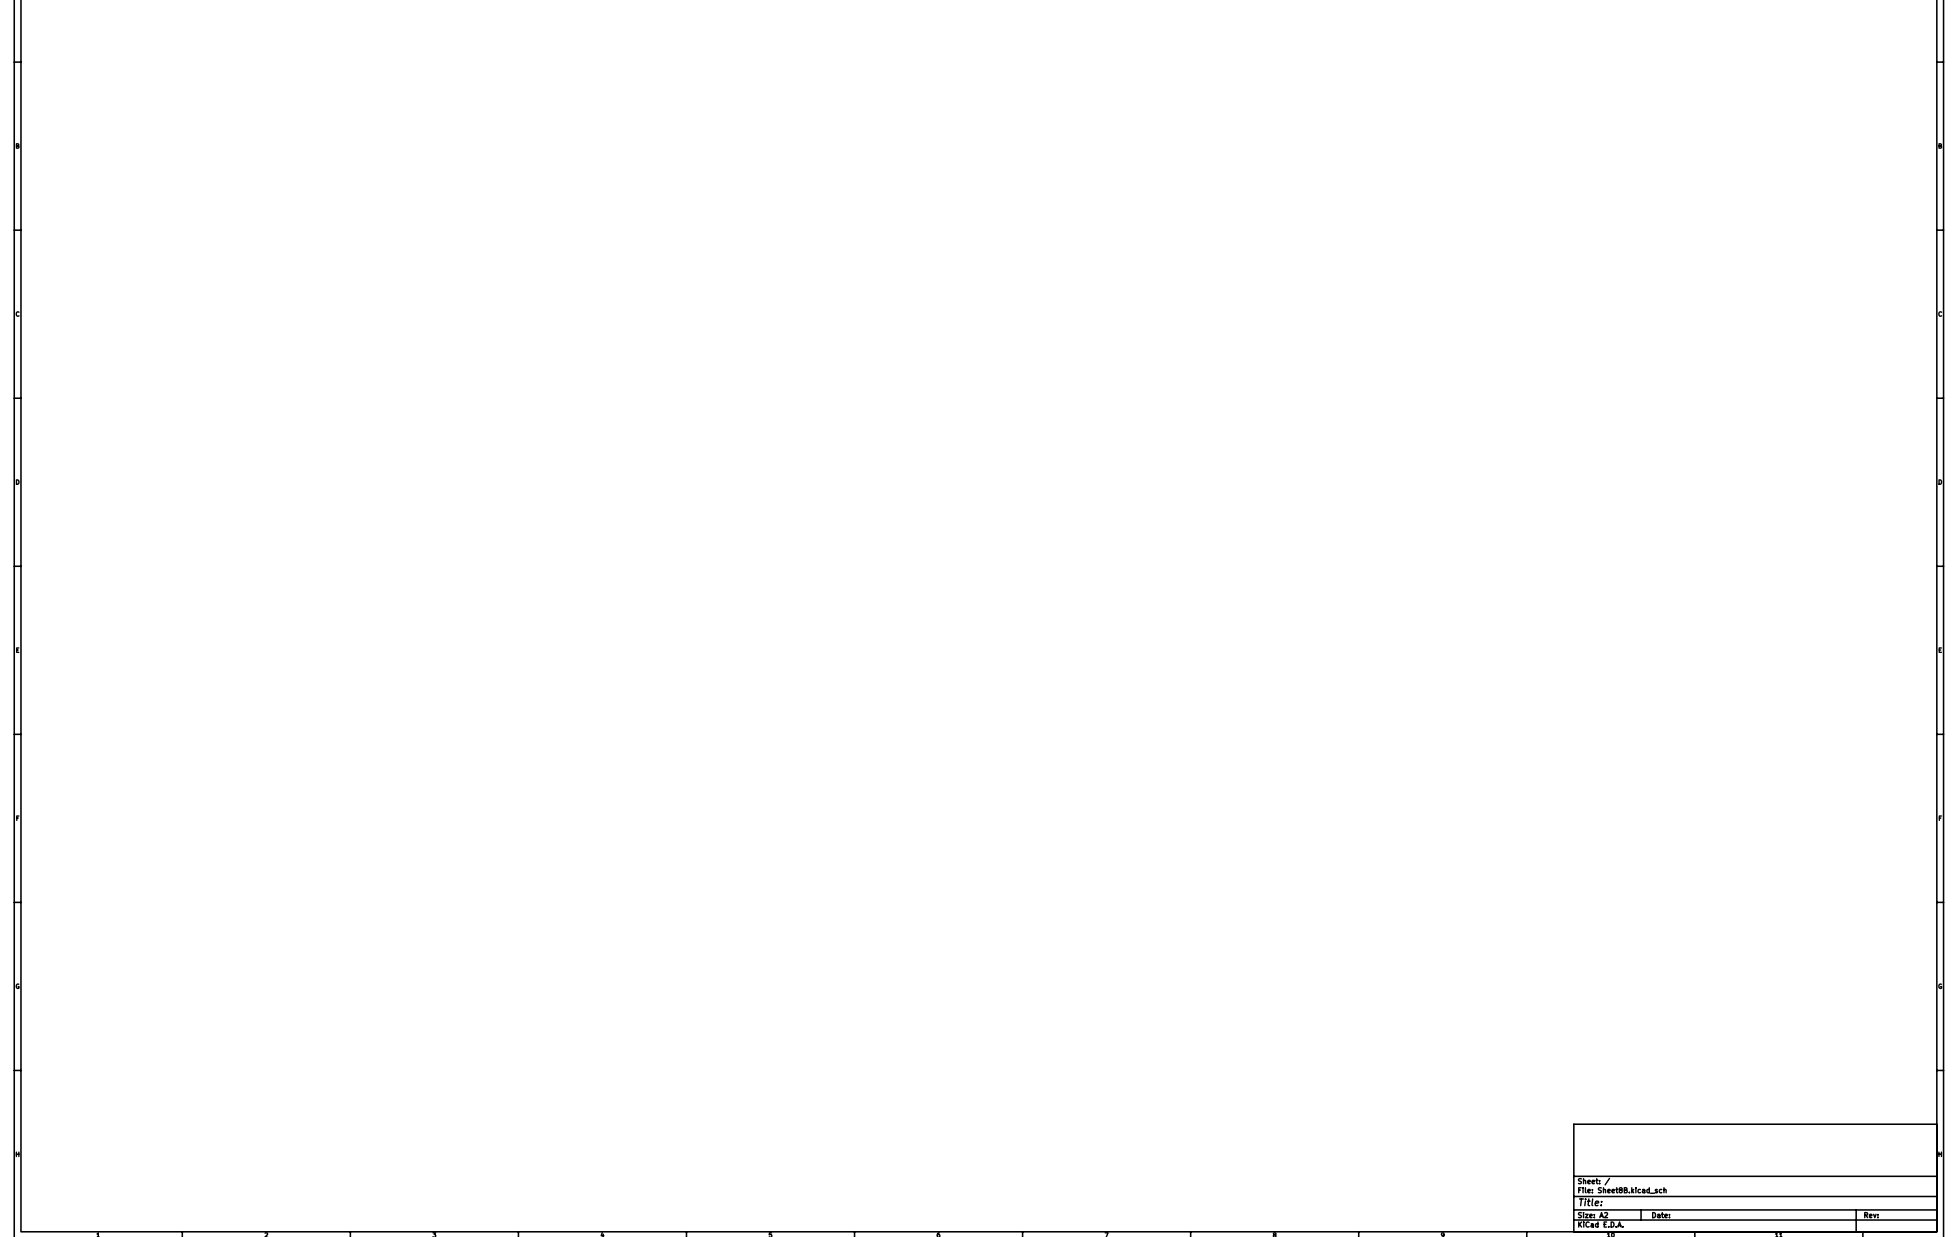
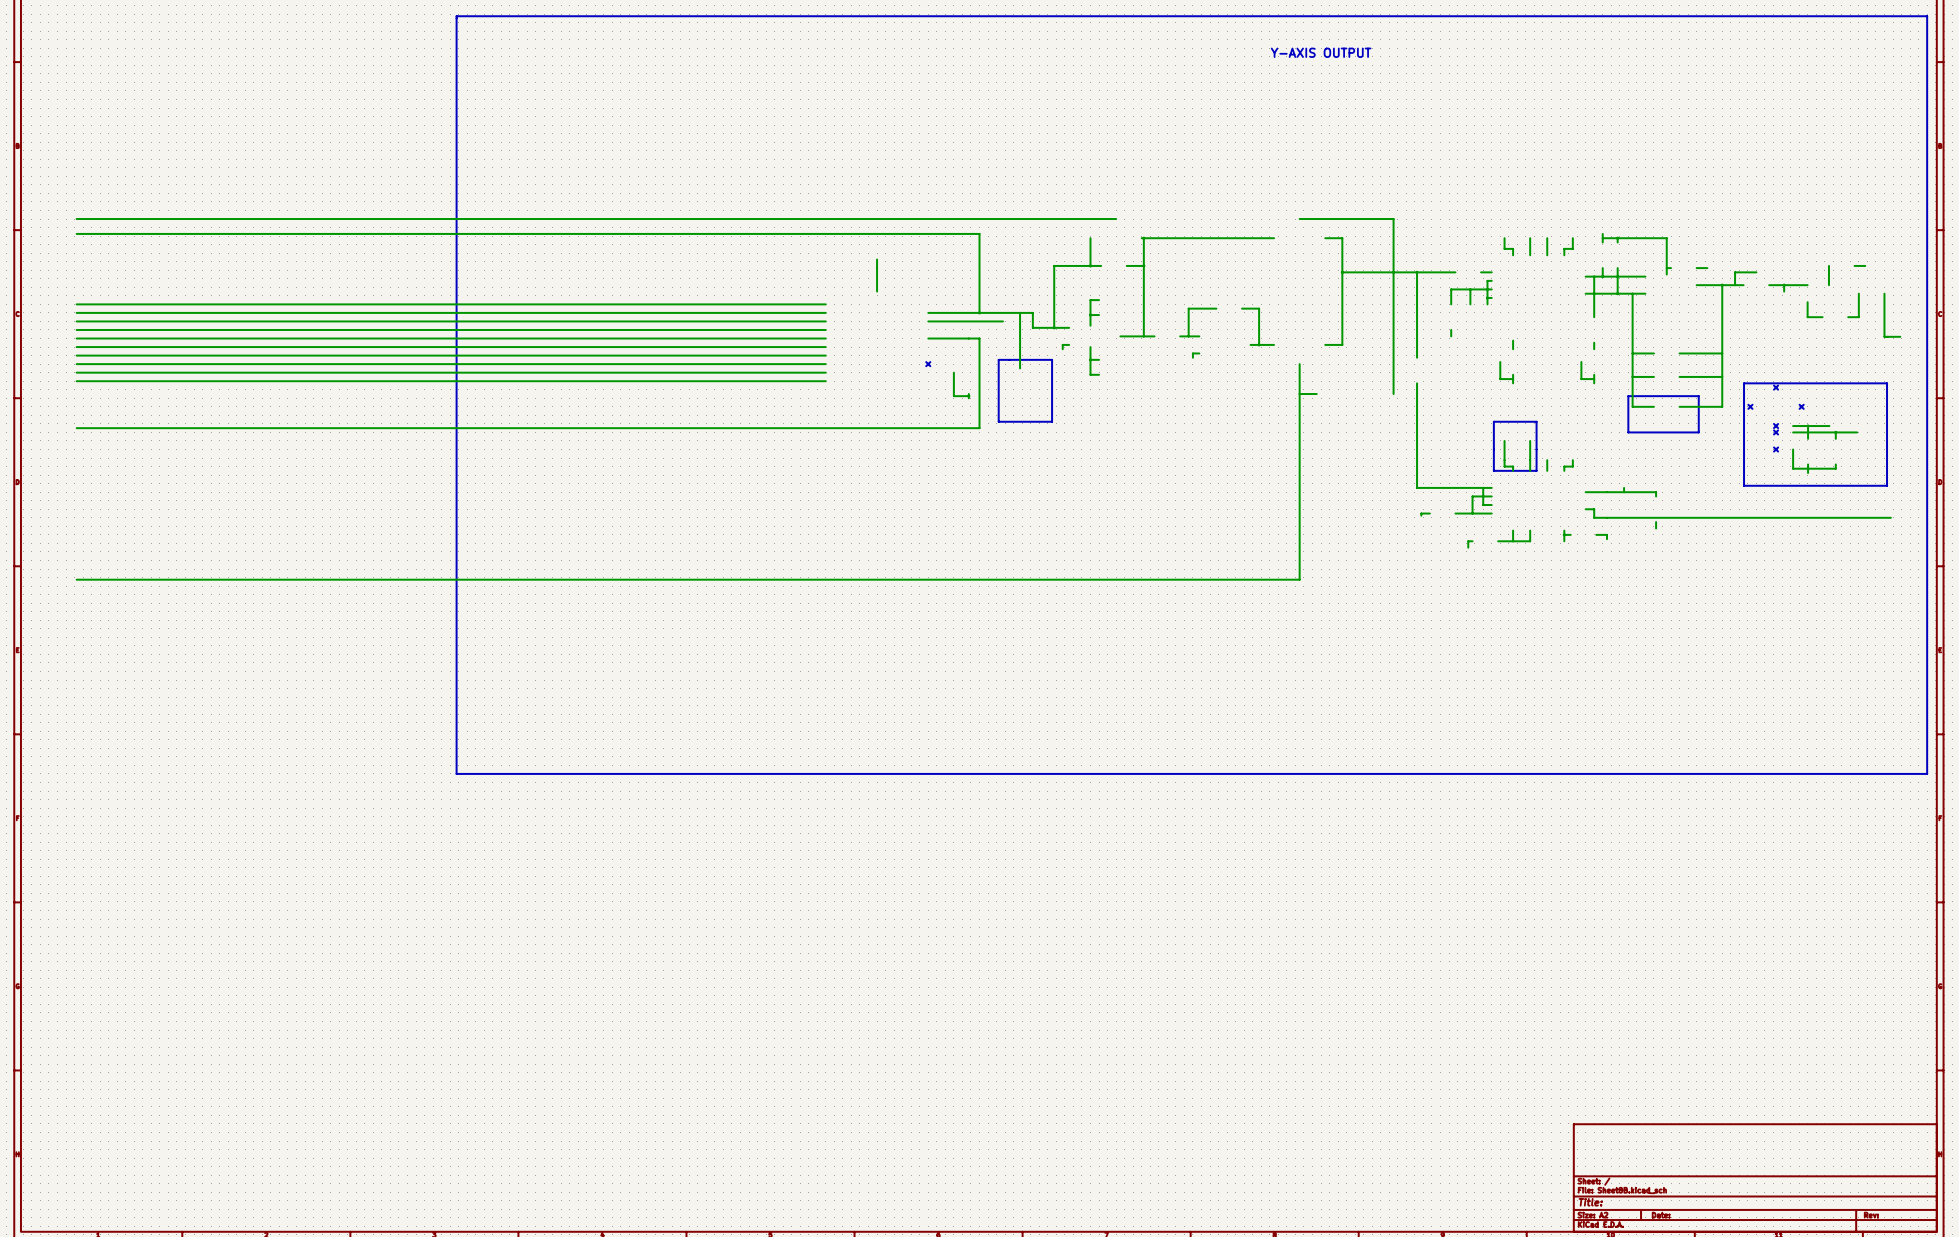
line: none -> (456, 16) (1927, 16) (1927, 773) (456, 773) (456, 16)
text: none -> Y-AXIS OUTPUT (1321, 52)
wire: none -> (76, 219) (1116, 219)
wire: none -> (1299, 219) (1393, 219) (1393, 394)
wire: none -> (76, 233) (979, 233) (979, 312)
wire: none -> (1602, 233) (1602, 242)
wire: none -> (1090, 238) (1090, 265)
wire: none -> (1141, 238) (1274, 238)
wire: none -> (1143, 238) (1143, 336)
wire: none -> (1325, 238) (1342, 238) (1342, 344) (1325, 344)
wire: none -> (1504, 238) (1504, 248) (1513, 248) (1513, 255)
wire: none -> (1530, 238) (1530, 255)
wire: none -> (1547, 238) (1547, 255)
wire: none -> (1572, 238) (1572, 248) (1564, 248) (1564, 255)
wire: none -> (1602, 238) (1666, 238) (1666, 274)
wire: none -> (1617, 238) (1617, 242)
wire: none -> (877, 259) (877, 291)
wire: none -> (1101, 265) (1054, 265) (1054, 327)
wire: none -> (1126, 265) (1143, 265)
wire: none -> (1828, 265) (1828, 285)
wire: none -> (1854, 265) (1865, 265)
wire: none -> (1602, 268) (1602, 276)
wire: none -> (1617, 268) (1617, 293)
wire: none -> (1666, 268) (1671, 268)
wire: none -> (1696, 268) (1707, 268)
wire: none -> (1342, 272) (1455, 272)
wire: none -> (1417, 272) (1417, 357)
wire: none -> (1481, 272) (1491, 272)
wire: none -> (1756, 272) (1735, 272) (1735, 285)
wire: none -> (1585, 276) (1645, 276)
wire: none -> (1594, 276) (1594, 317)
wire: none -> (1491, 280) (1487, 280) (1487, 304)
wire: none -> (1696, 285) (1743, 285)
wire: none -> (1722, 285) (1722, 406) (1679, 406)
wire: none -> (1769, 285) (1807, 285)
wire: none -> (1784, 285) (1784, 291)
wire: none -> (1470, 289) (1470, 304)
wire: none -> (1491, 289) (1451, 289) (1451, 304)
wire: none -> (1585, 293) (1645, 293)
wire: none -> (1632, 293) (1632, 406) (1653, 406)
wire: none -> (1858, 293) (1858, 317) (1848, 317)
wire: none -> (1884, 293) (1884, 336) (1900, 336)
wire: none -> (1487, 297) (1491, 297)
wire: none -> (1099, 300) (1090, 300) (1090, 325)
wire: none -> (1807, 302) (1807, 317) (1822, 317)
wire: none -> (76, 304) (825, 304)
wire: none -> (1216, 308) (1188, 308) (1188, 336)
wire: none -> (1242, 308) (1259, 308) (1259, 344)
wire: none -> (76, 312) (825, 312)
wire: none -> (928, 312) (1032, 312) (1032, 327) (1069, 327)
wire: none -> (1020, 312) (1020, 368)
wire: none -> (1090, 315) (1099, 315)
wire: none -> (76, 321) (825, 321)
wire: none -> (928, 321) (1002, 321)
wire: none -> (76, 329) (825, 329)
wire: none -> (1451, 329) (1451, 336)
wire: none -> (1120, 336) (1154, 336)
wire: none -> (1180, 336) (1199, 336)
wire: none -> (76, 338) (825, 338)
wire: none -> (928, 338) (979, 338) (979, 428) (76, 428)
wire: none -> (1513, 340) (1513, 349)
wire: none -> (1594, 342) (1594, 349)
wire: none -> (1069, 344) (1062, 344) (1062, 349)
wire: none -> (1250, 344) (1274, 344)
wire: none -> (76, 347) (825, 347)
wire: none -> (1090, 347) (1090, 374) (1099, 374)
wire: none -> (1199, 353) (1192, 353) (1192, 357)
wire: none -> (1632, 353) (1653, 353)
wire: none -> (1679, 353) (1722, 353)
wire: none -> (76, 355) (825, 355)
line: none -> (998, 359) (1052, 359) (1052, 421) (998, 421) (998, 359)
wire: none -> (1090, 359) (1099, 359)
wire: none -> (1500, 362) (1500, 379) (1513, 379)
wire: none -> (1581, 362) (1581, 379) (1594, 379)
wire: none -> (76, 364) (825, 364)
no-connect mark: none -> (928, 364)
wire: none -> (1299, 364) (1299, 579) (76, 579)
wire: none -> (76, 372) (825, 372)
wire: none -> (953, 372) (953, 396) (968, 396)
wire: none -> (1513, 374) (1513, 383)
wire: none -> (1594, 374) (1594, 383)
wire: none -> (1632, 376) (1653, 376)
wire: none -> (1679, 376) (1722, 376)
wire: none -> (76, 381) (825, 381)
wire: none -> (1417, 383) (1417, 487) (1491, 487)
line: none -> (1744, 383) (1887, 383) (1887, 485) (1744, 485) (1744, 383)
no-connect mark: none -> (1776, 387)
wire: none -> (968, 394) (968, 398)
wire: none -> (1299, 394) (1316, 394)
line: none -> (1628, 396) (1628, 432) (1698, 432) (1698, 396) (1628, 396)
no-connect mark: none -> (1750, 406)
no-connect mark: none -> (1801, 406)
line: none -> (1493, 421) (1493, 470) (1536, 470) (1536, 421) (1493, 421)
no-connect mark: none -> (1776, 426)
wire: none -> (1793, 426) (1829, 426)
wire: none -> (1808, 426) (1808, 438)
no-connect mark: none -> (1776, 432)
wire: none -> (1793, 432) (1857, 432)
wire: none -> (1835, 432) (1835, 438)
wire: none -> (1504, 440) (1504, 466) (1513, 466) (1513, 470)
wire: none -> (1530, 440) (1530, 470)
no-connect mark: none -> (1776, 449)
wire: none -> (1793, 449) (1793, 468) (1835, 468) (1835, 464)
wire: none -> (1547, 460) (1547, 470)
wire: none -> (1572, 460) (1572, 466) (1564, 466) (1564, 470)
wire: none -> (1808, 464) (1808, 472)
wire: none -> (1483, 487) (1483, 505) (1491, 505)
wire: none -> (1624, 487) (1624, 492)
wire: none -> (1585, 492) (1656, 492) (1656, 496)
wire: none -> (1491, 496) (1472, 496) (1472, 513)
wire: none -> (1585, 509) (1594, 509) (1594, 517) (1890, 517)
wire: none -> (1429, 513) (1421, 513) (1421, 515)
wire: none -> (1455, 513) (1491, 513)
wire: none -> (1656, 522) (1656, 528)
wire: none -> (1513, 530) (1513, 541)
wire: none -> (1530, 530) (1530, 541) (1498, 541)
wire: none -> (1564, 530) (1564, 541)
wire: none -> (1564, 534) (1570, 534)
wire: none -> (1596, 534) (1607, 534) (1607, 539)
wire: none -> (1472, 541) (1468, 541) (1468, 547)

